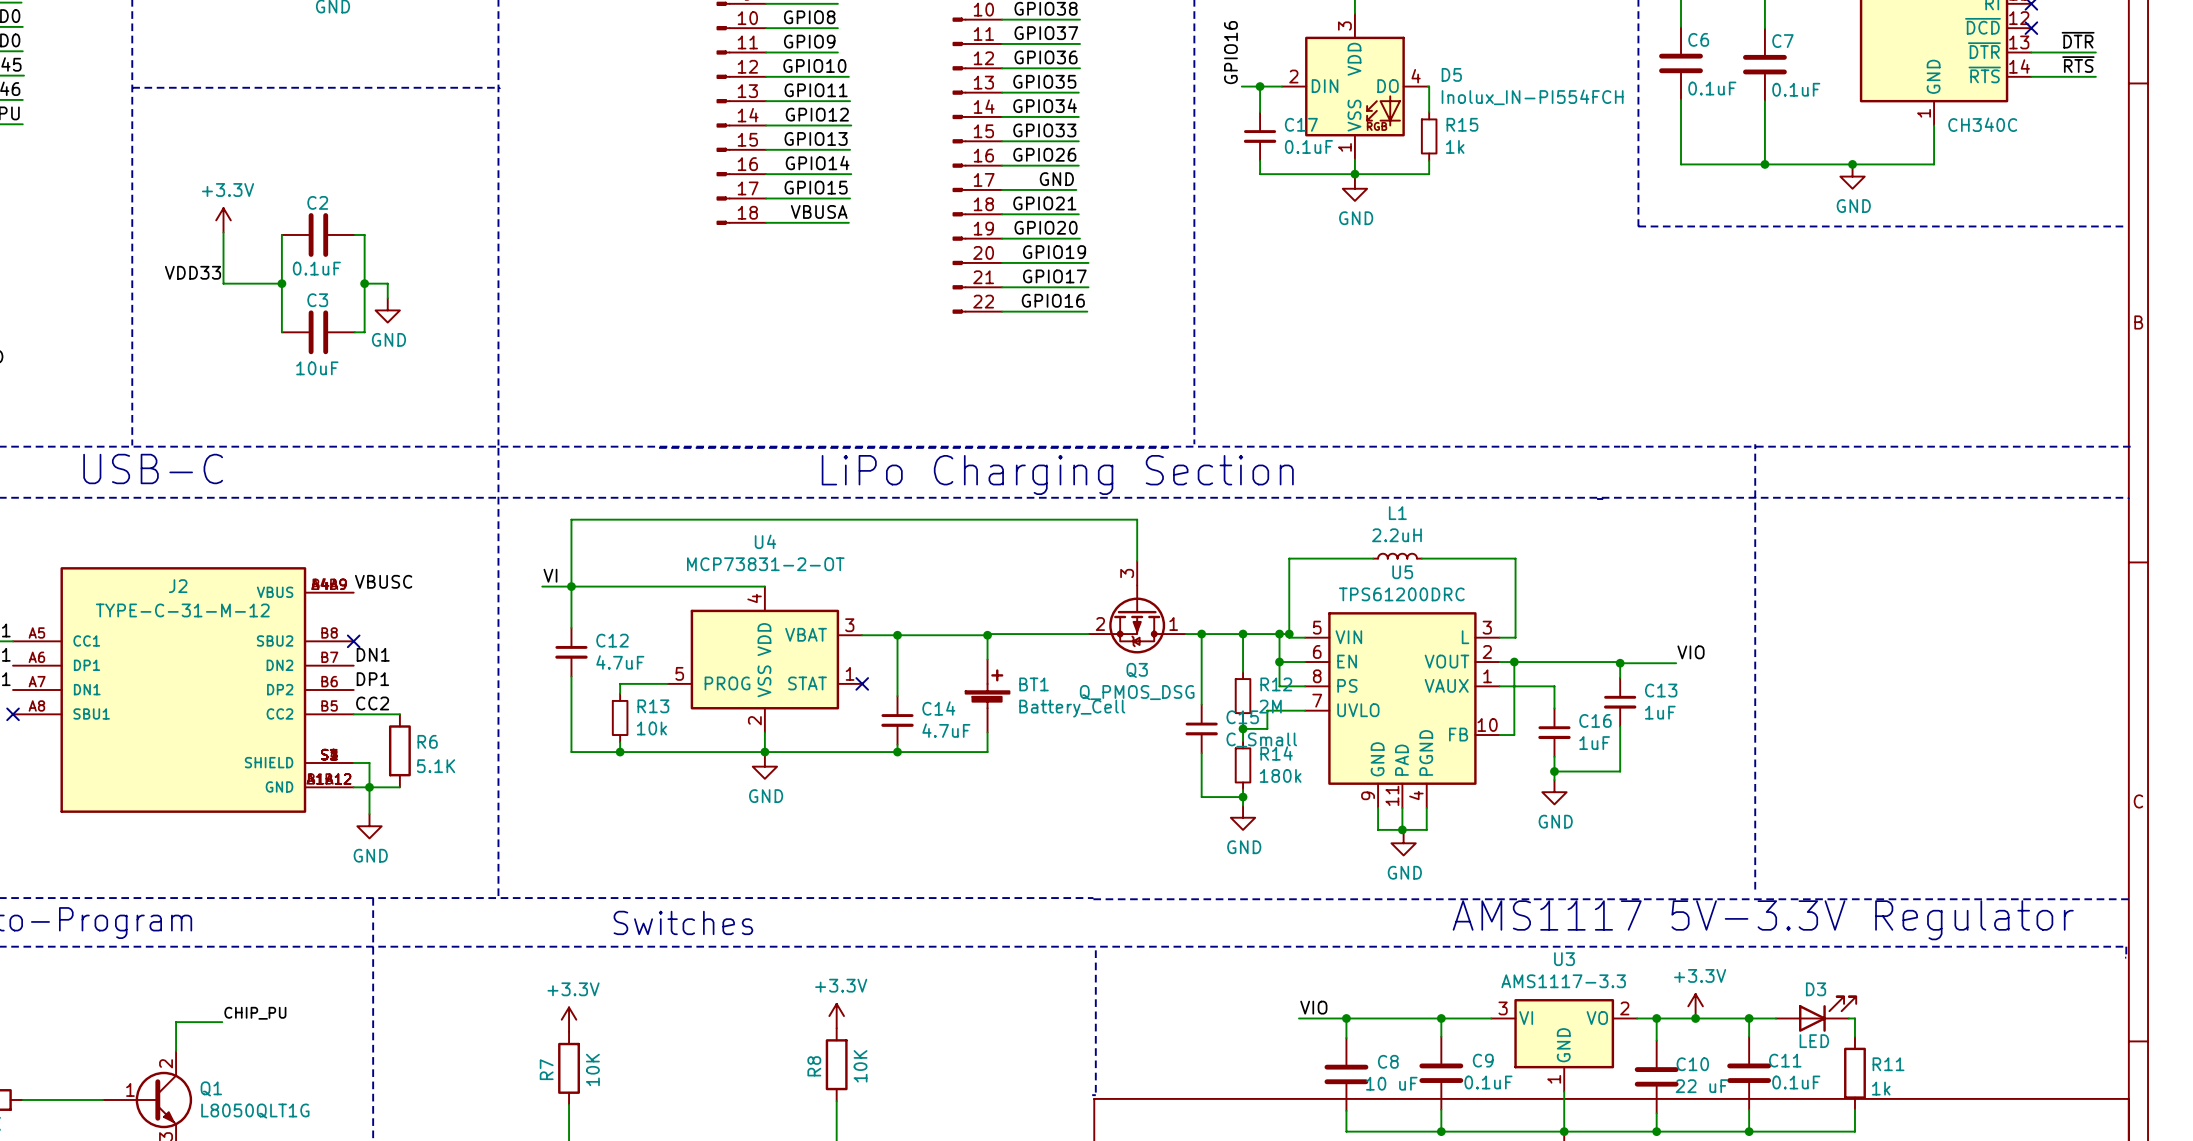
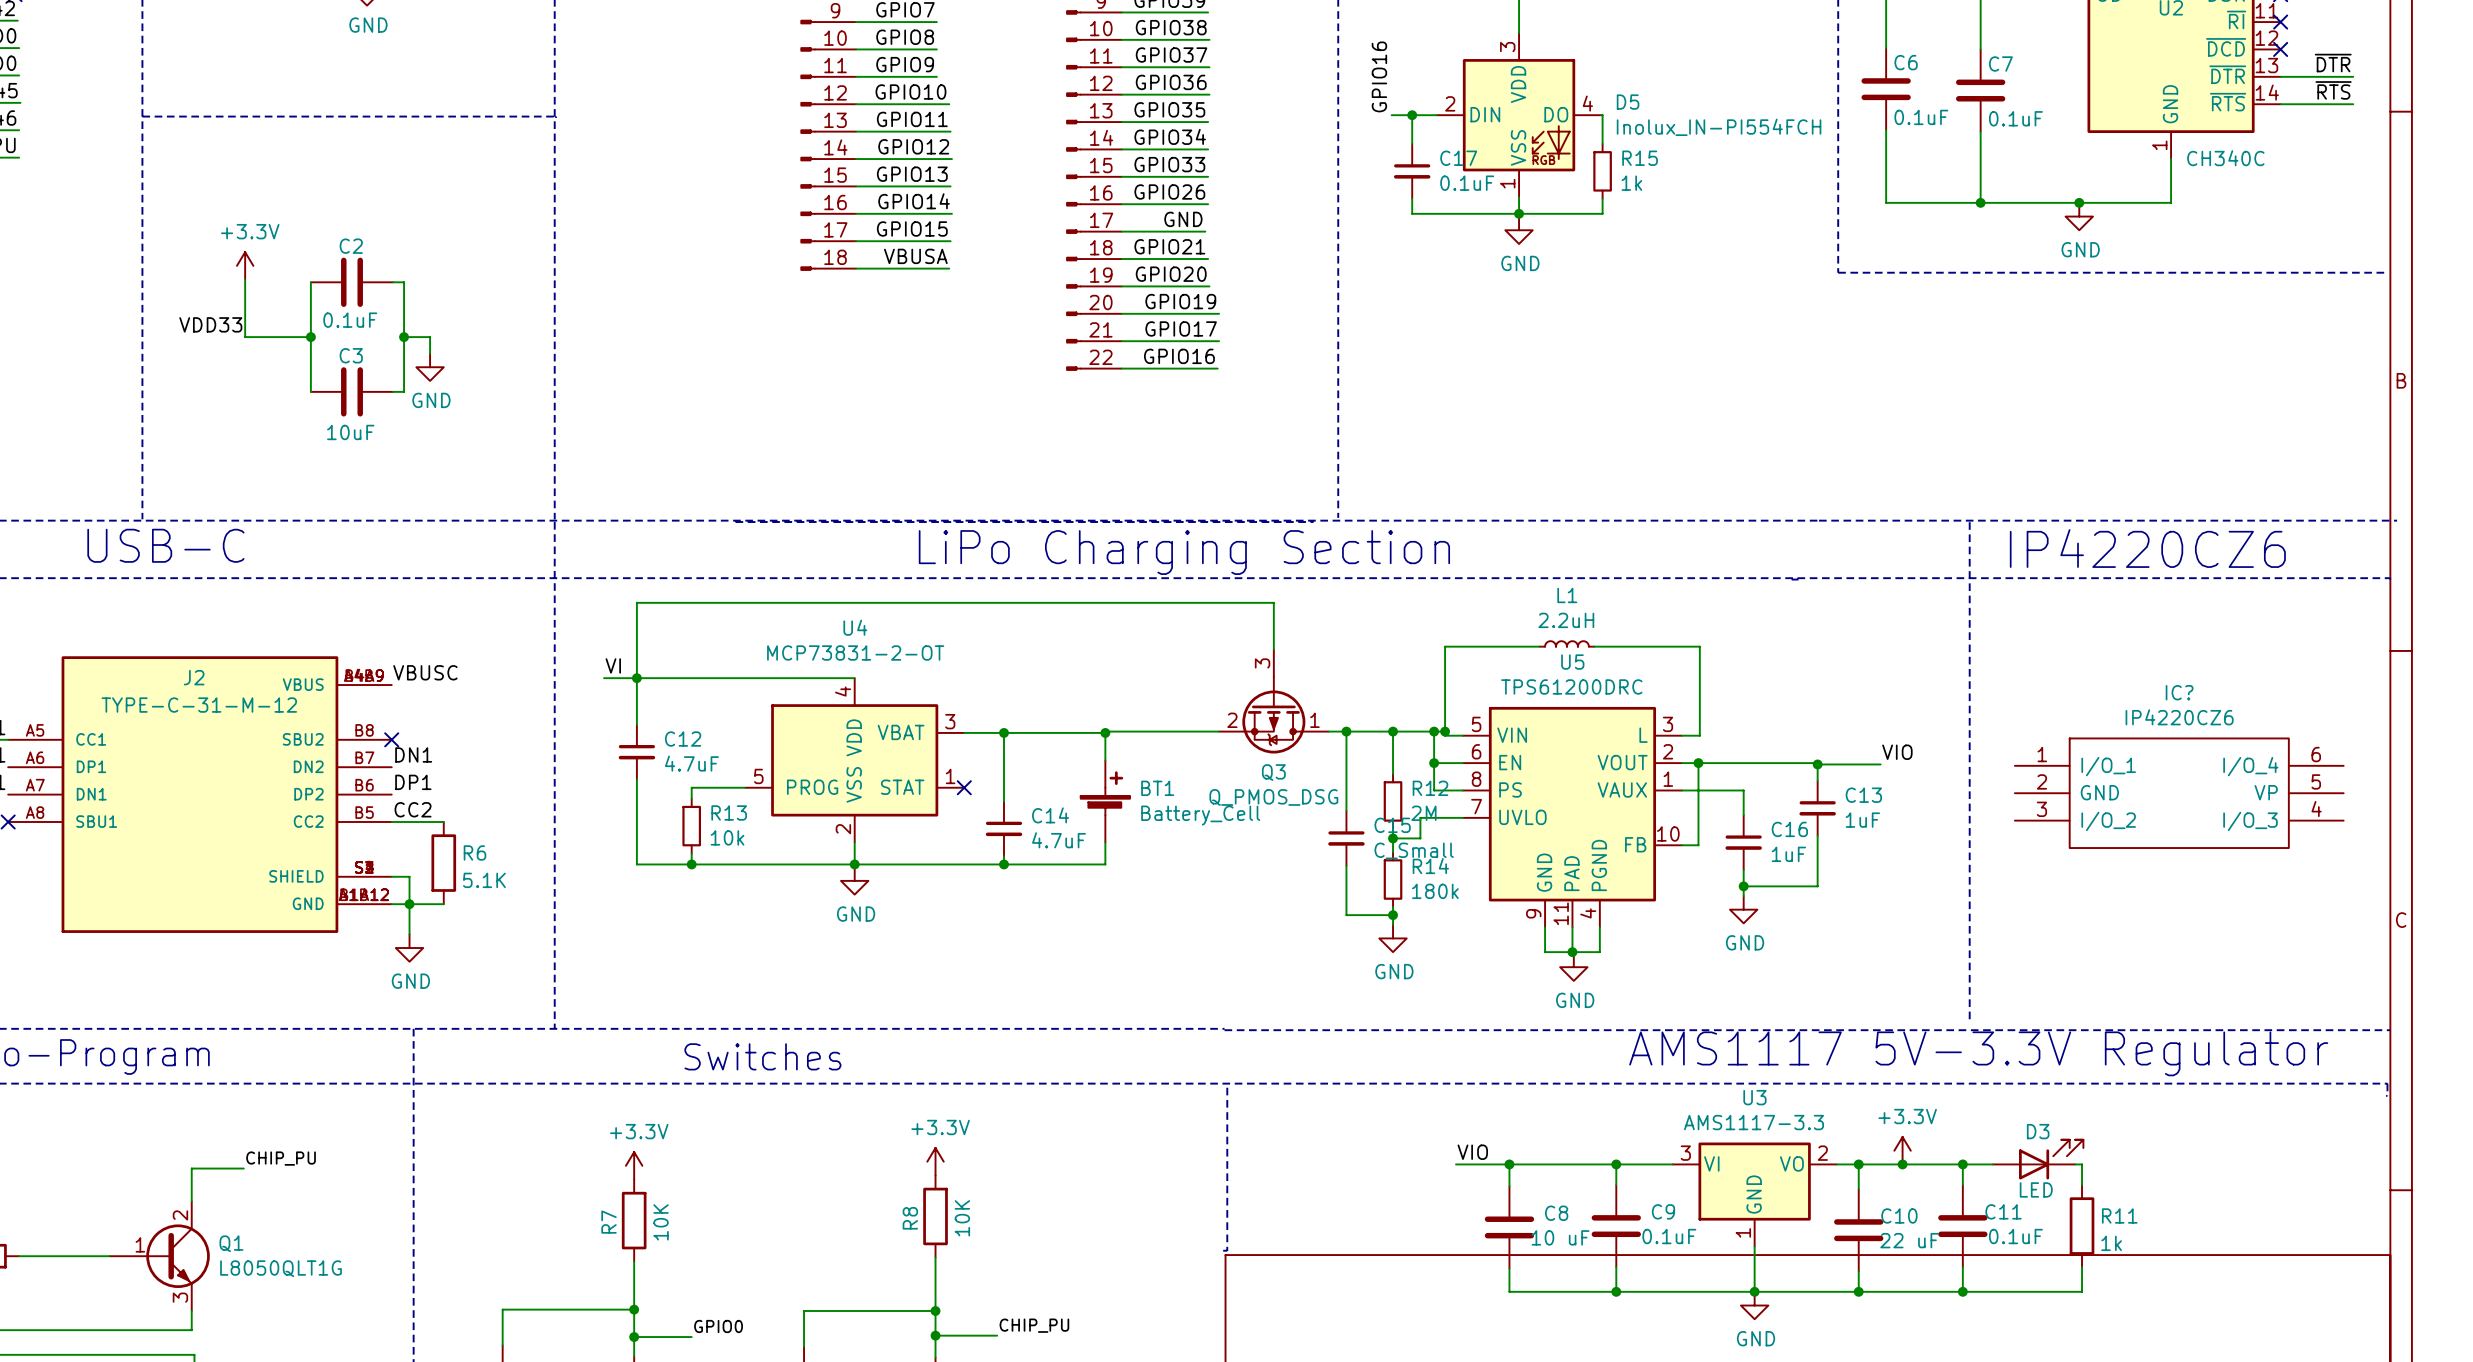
text: none -> IP4220CZ6 (2147, 548)
IC?: none -> IP4220CZ6 (2179, 793)

